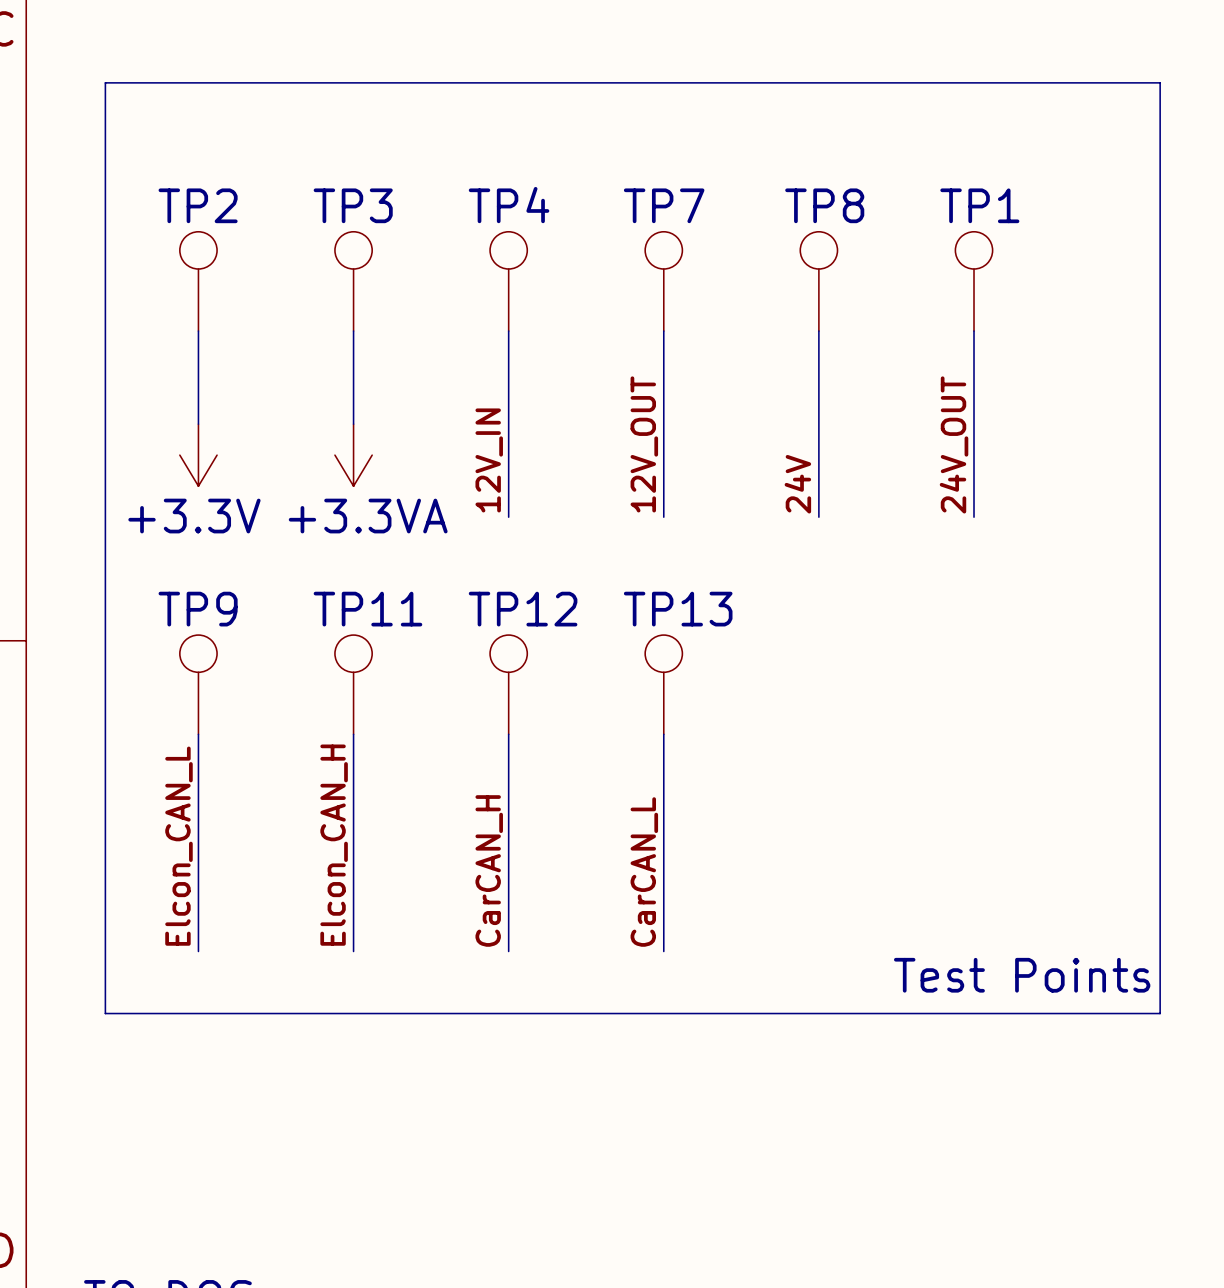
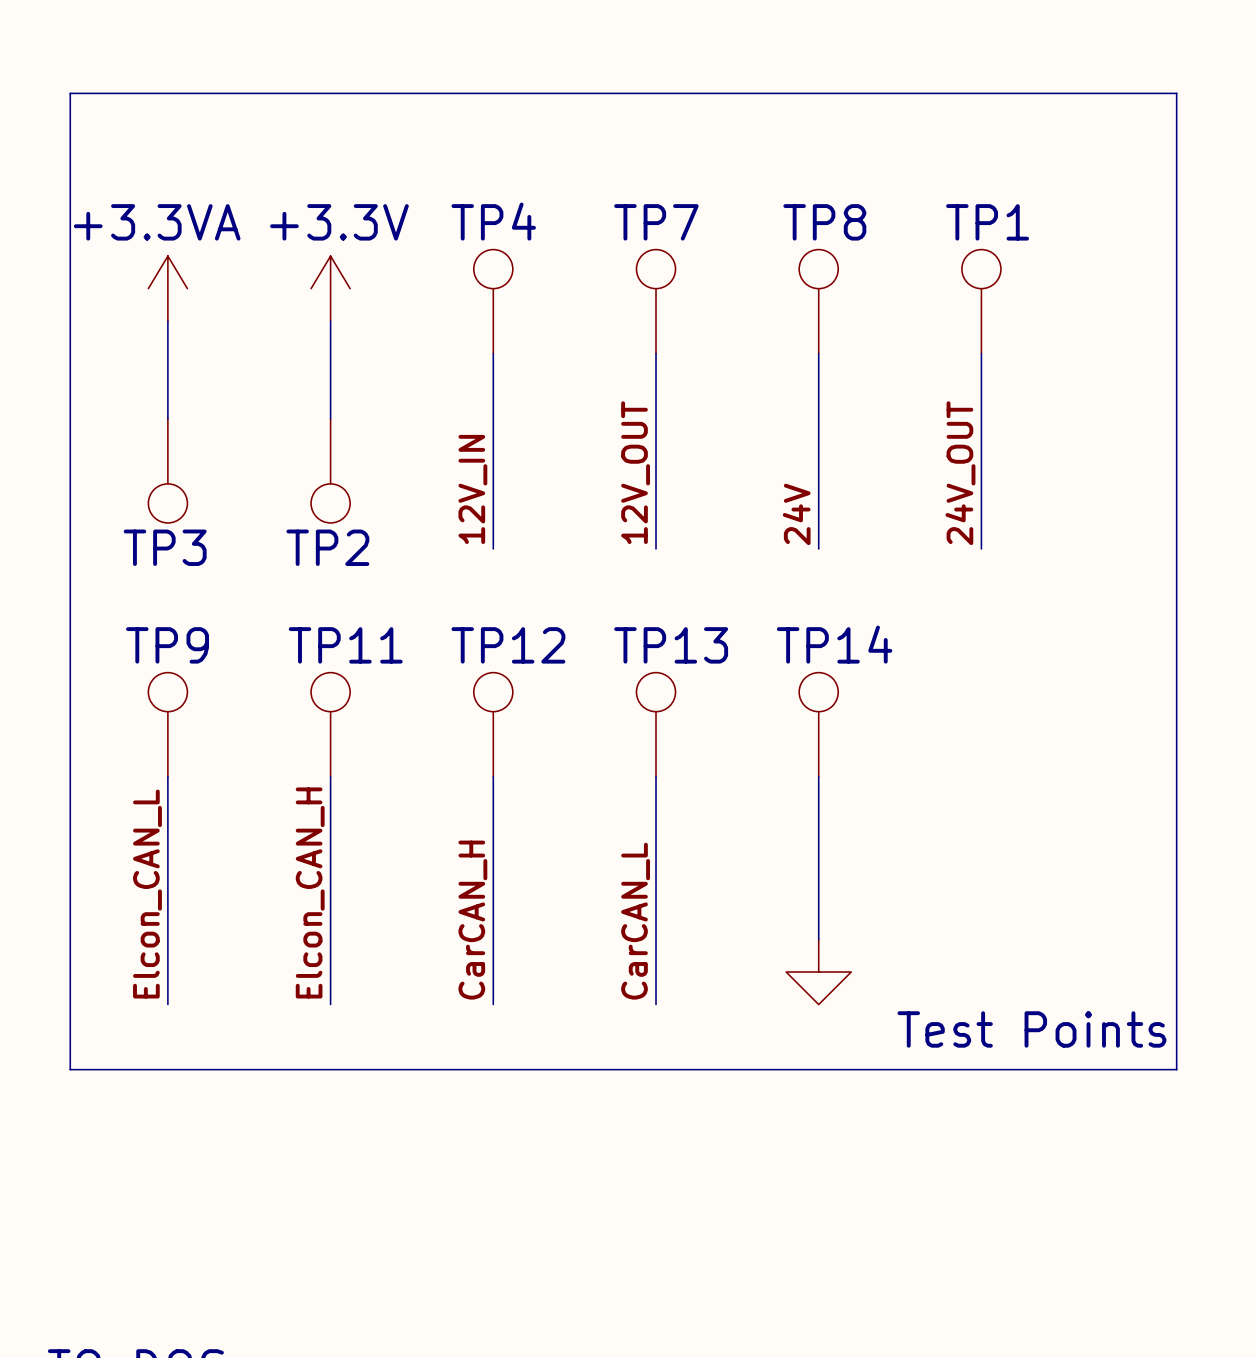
TP2 rotation: 0° (198, 250) -> 180° (330, 503)
TP3 rotation: 0° (353, 250) -> 180° (167, 503)
TP2 position: (198, 281) -> (330, 470)
TP3 position: (353, 281) -> (167, 470)
power symbol rotation: 0° (198, 455) -> 180° (330, 288)
power symbol position: +3.3V (198, 455) -> +3.3V (330, 288)
power symbol rotation: 0° (353, 455) -> 180° (167, 288)
power symbol position: +3.3VA (353, 455) -> +3.3VA (167, 288)
TP14: none -> (818, 724)
wire: none -> (818, 776) (818, 939)
power symbol: none -> (818, 972)

